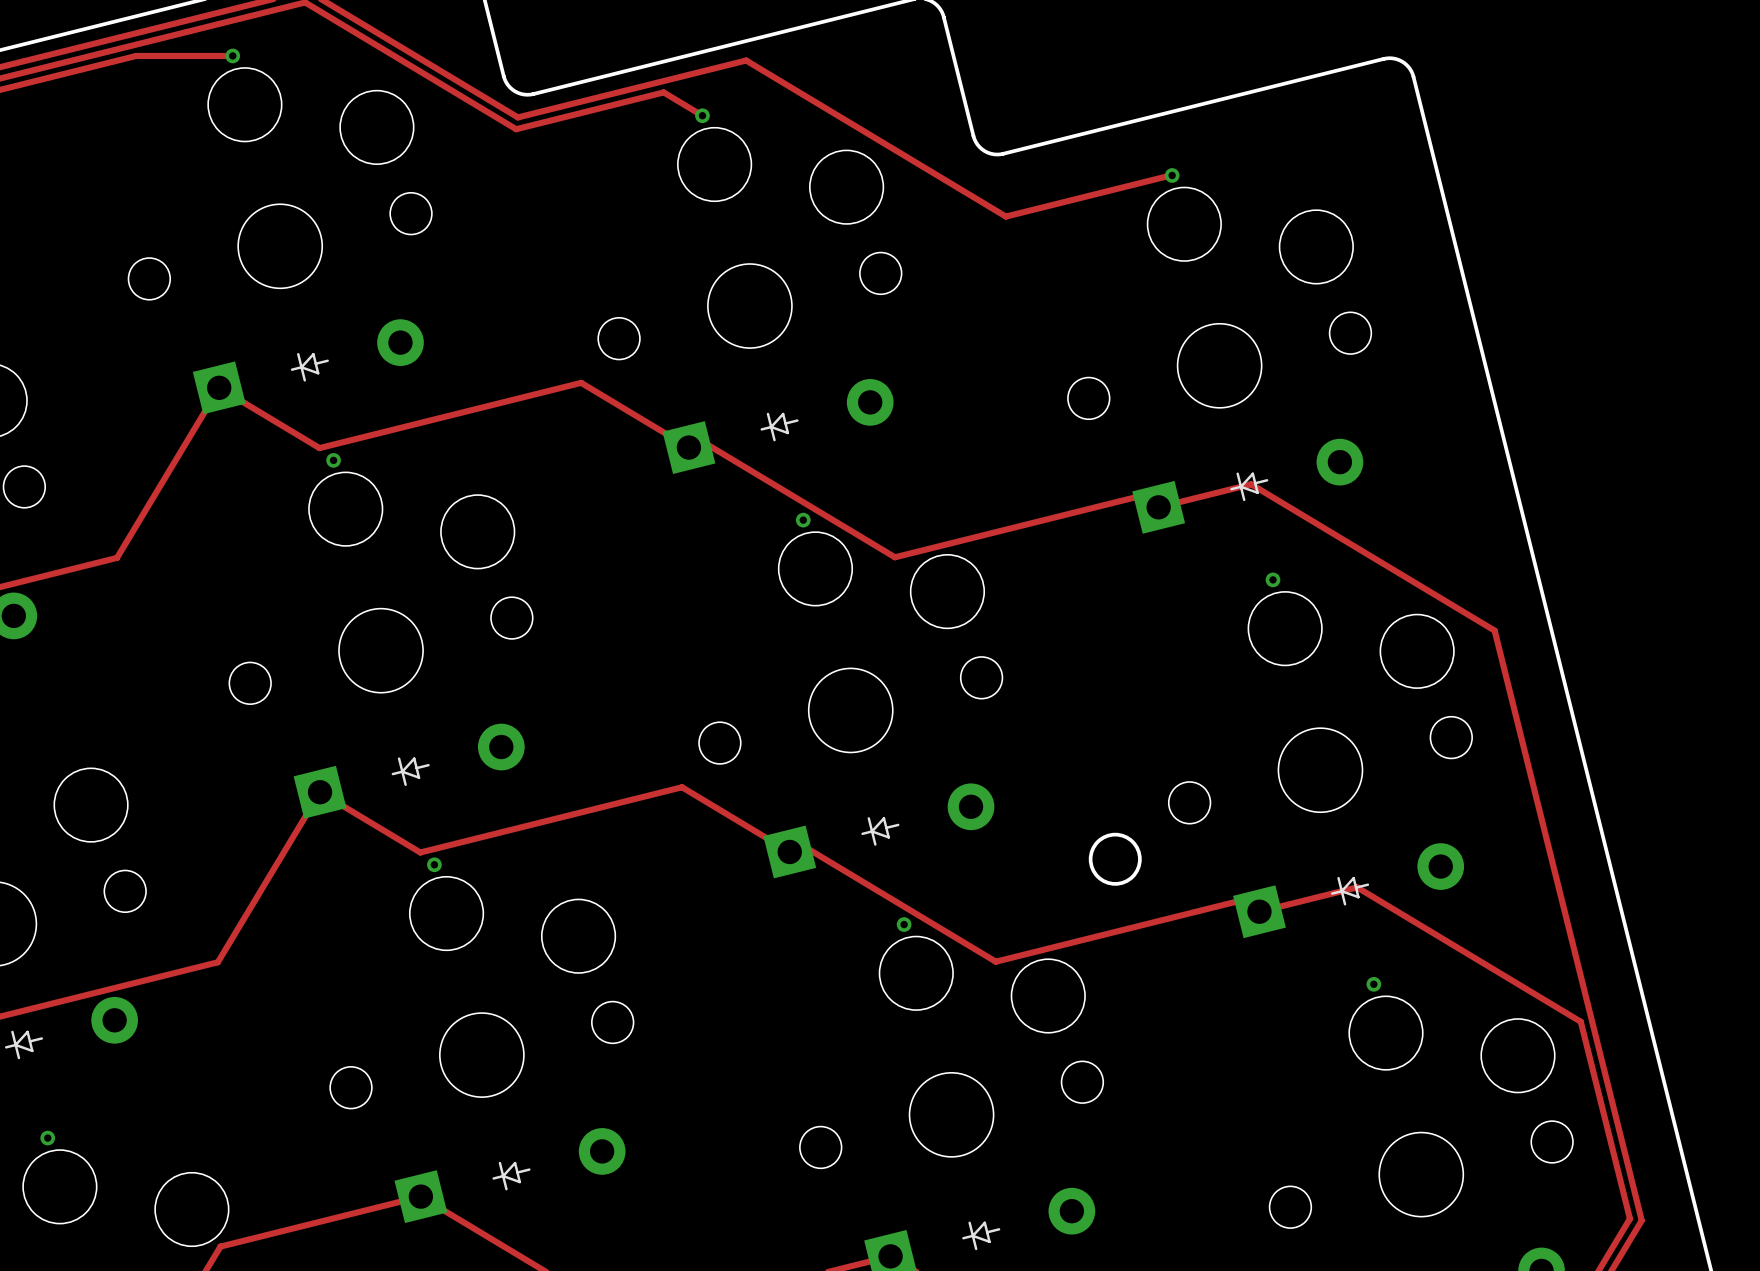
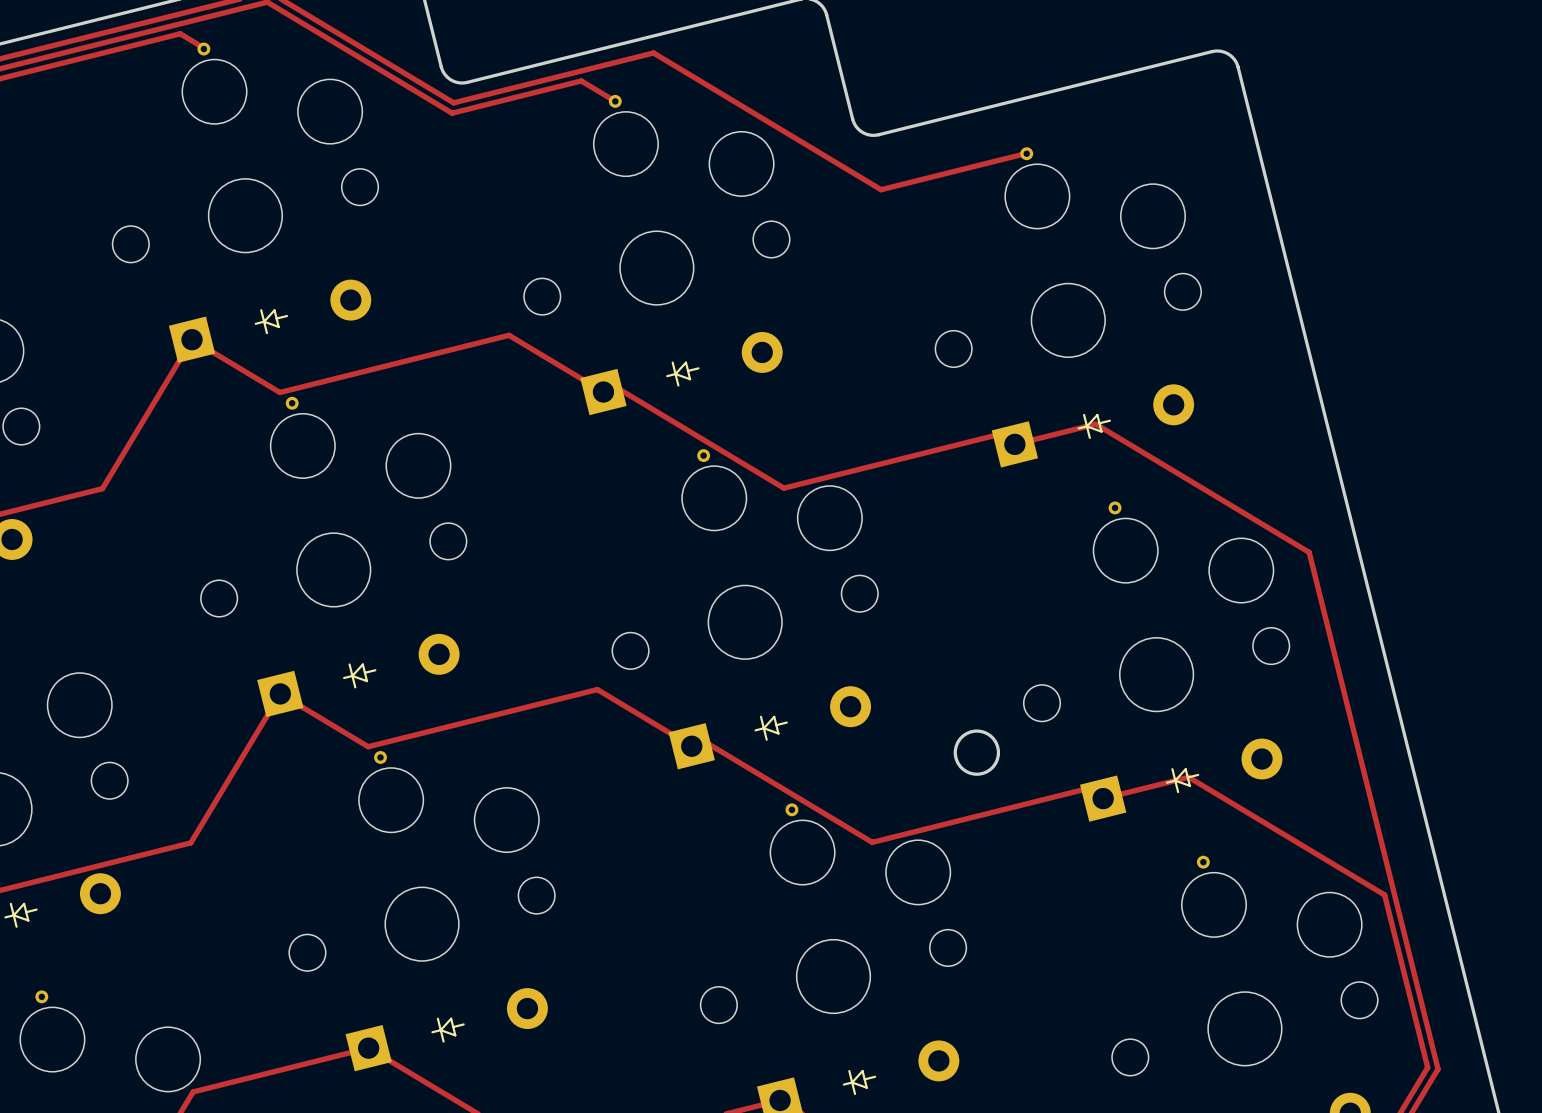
track: (136, 55) (232, 55) -> (119, 49) (180, 33) (203, 49)

